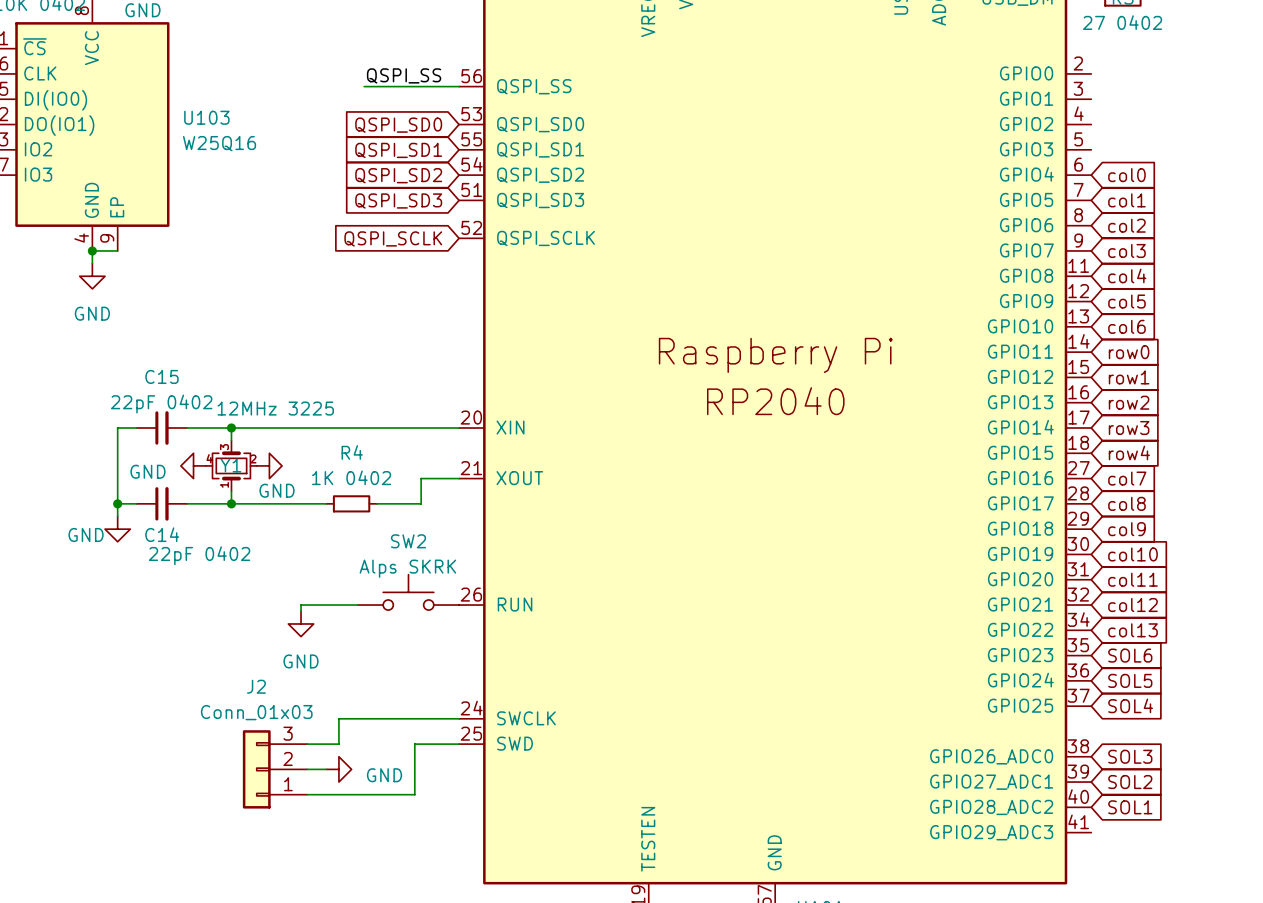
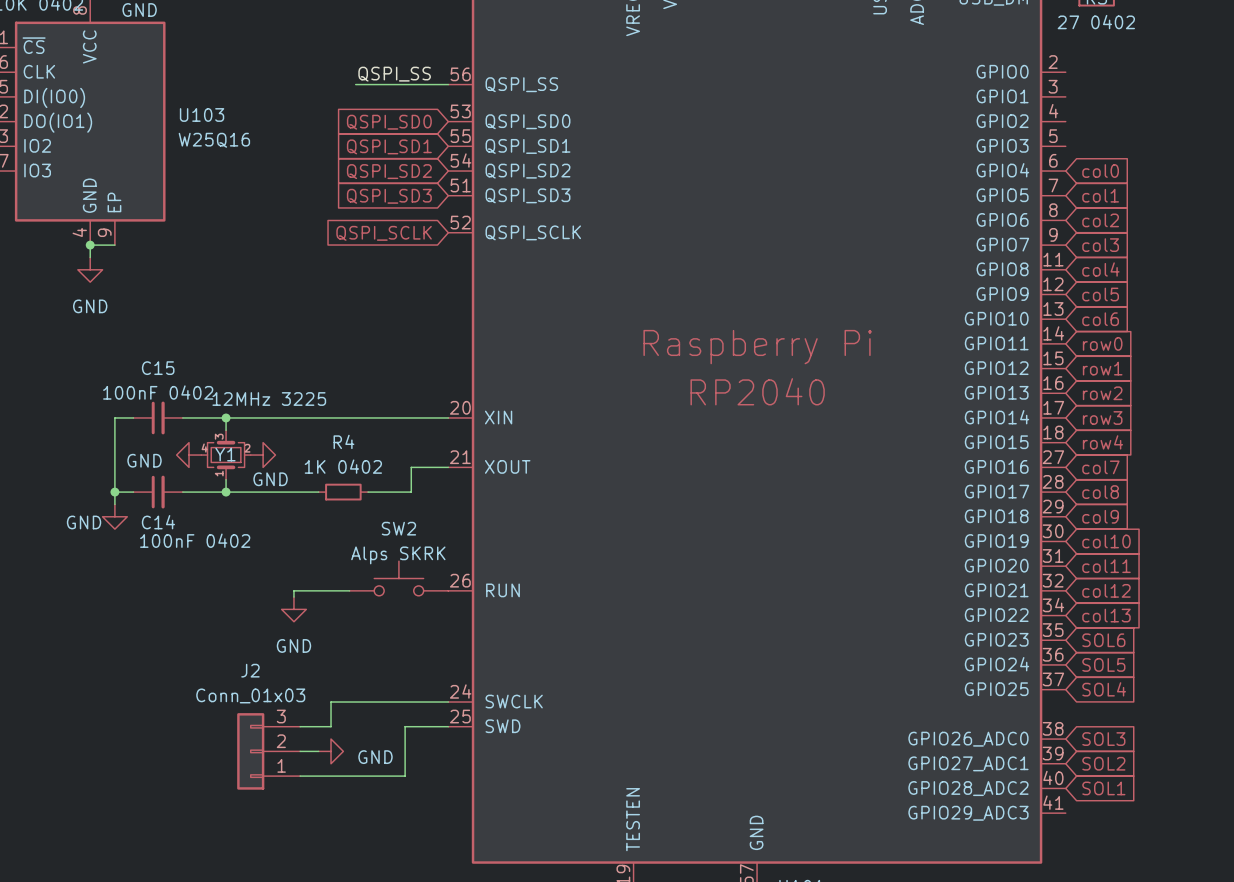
C15 value: 22pF 0402 (161, 404) -> 100nF 0402 (158, 392)
C14 value: 22pF 0402 (199, 555) -> 100nF 0402 (195, 540)

